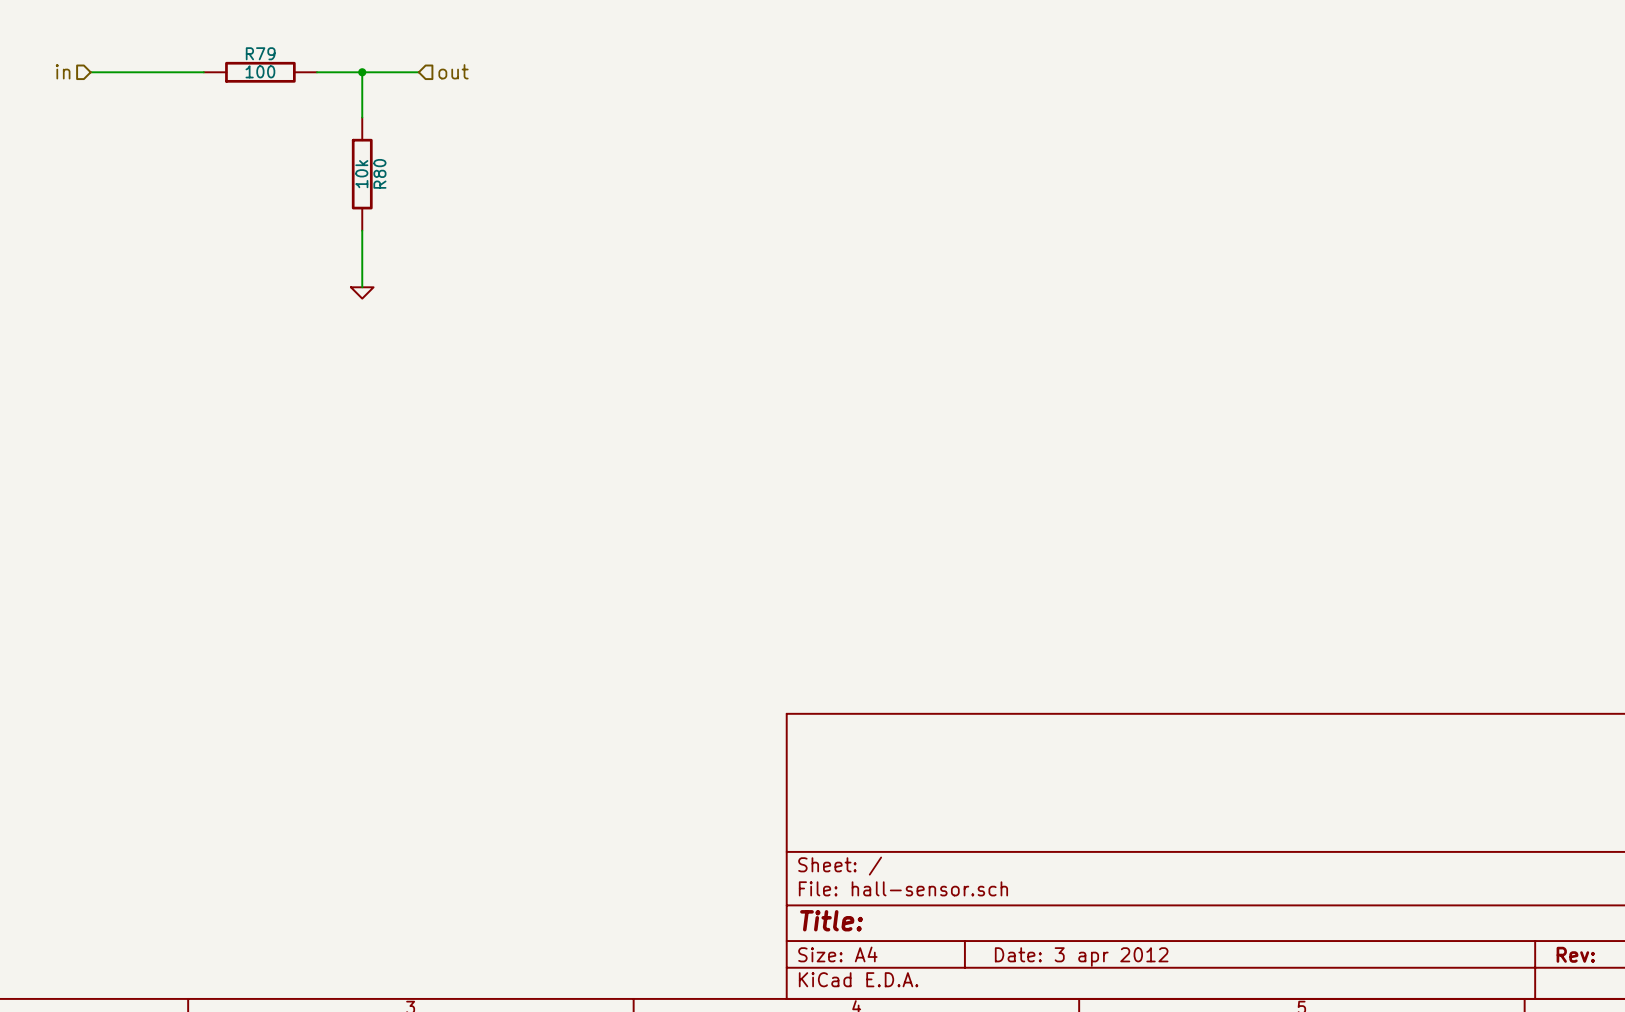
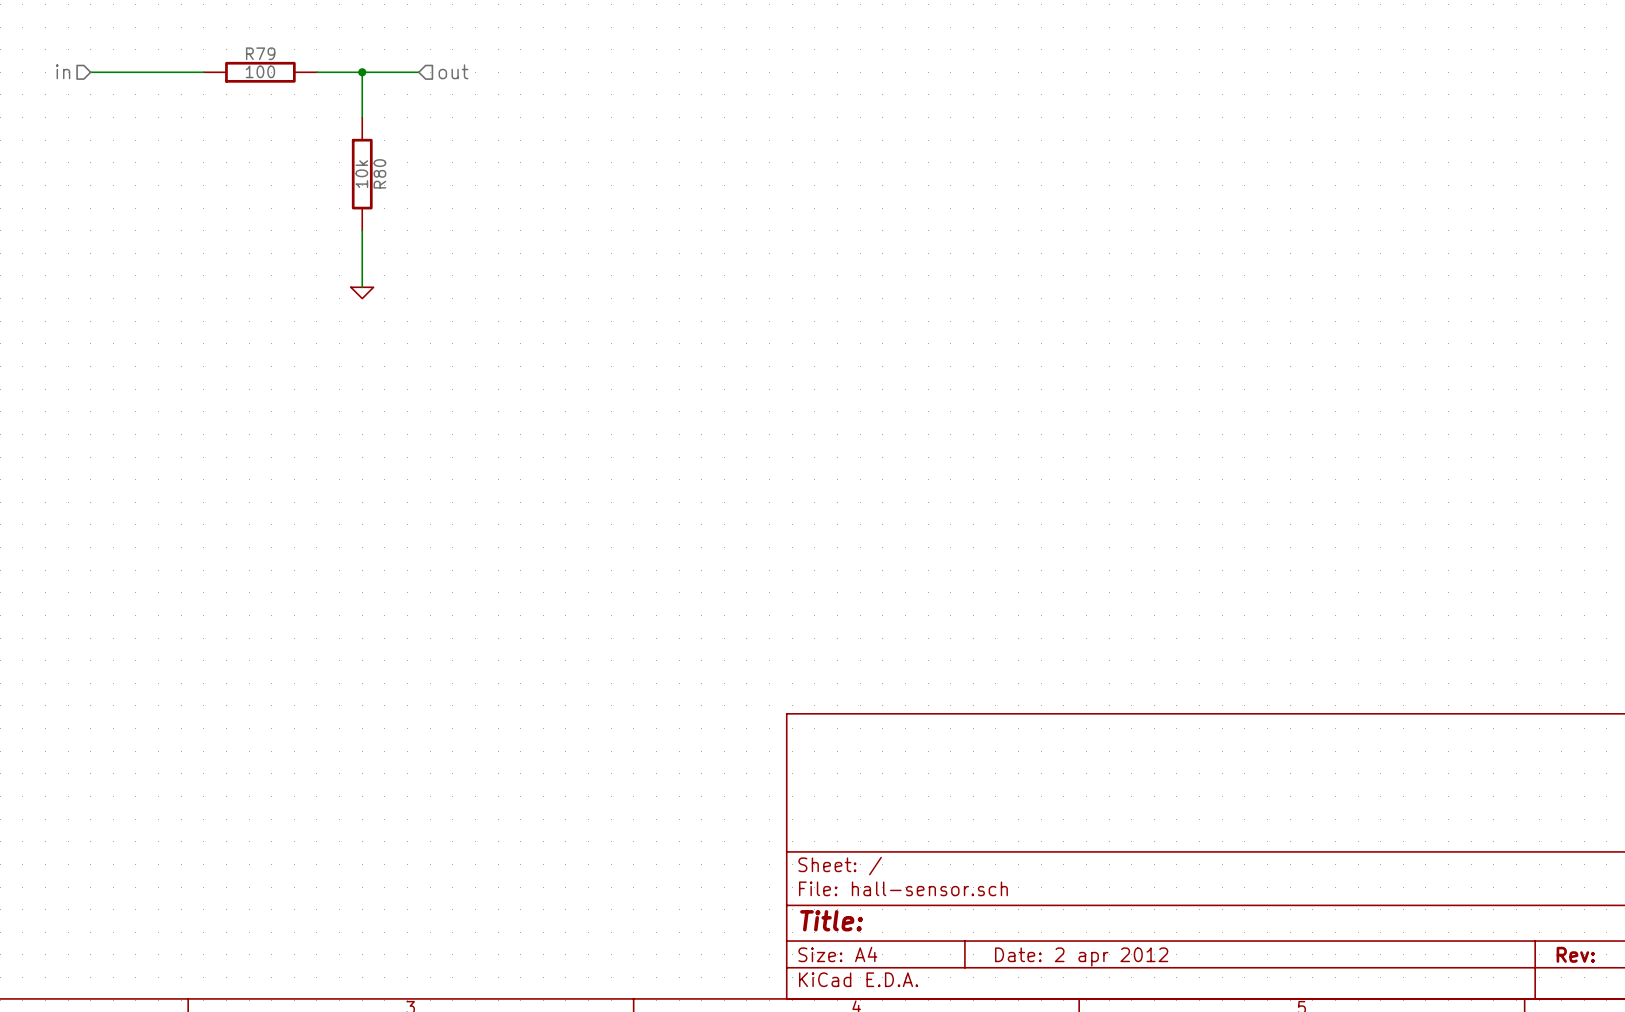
title block: Date: 3 apr 2012 (1081, 957) -> Date: 2 apr 2012 (1081, 957)

